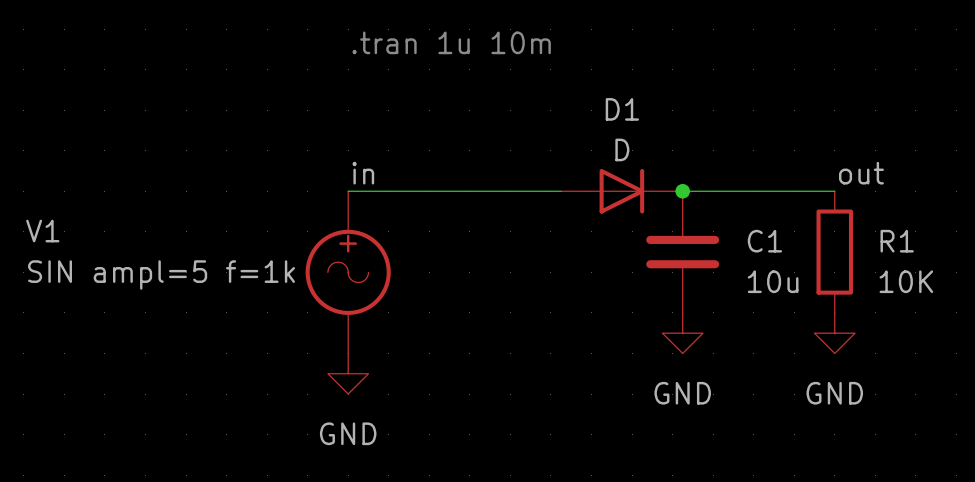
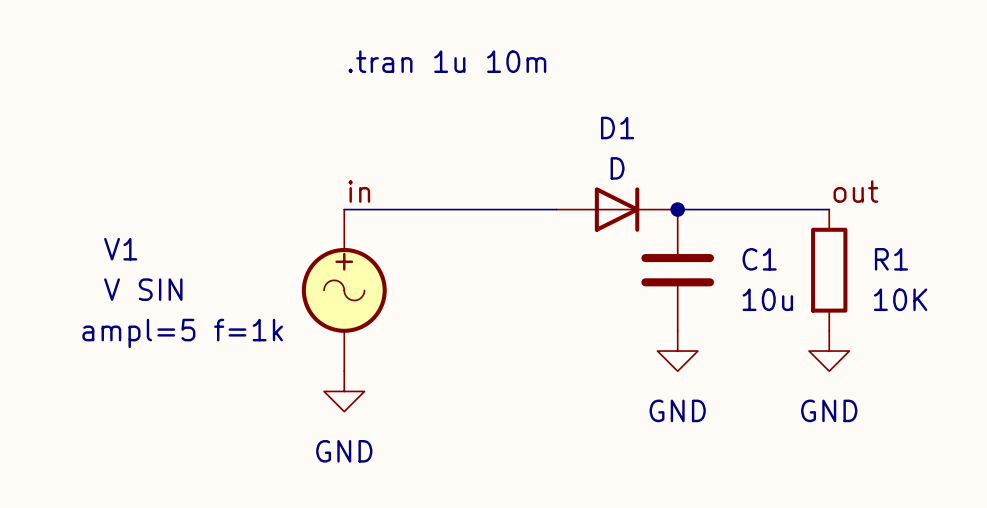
V1 name position: V1 (42, 231) -> V1 (120, 249)
V1 value: SIN ampl=5 f=1k (161, 274) -> V SIN (143, 289)
V1 text: none -> ampl=5 f=1k (182, 333)

